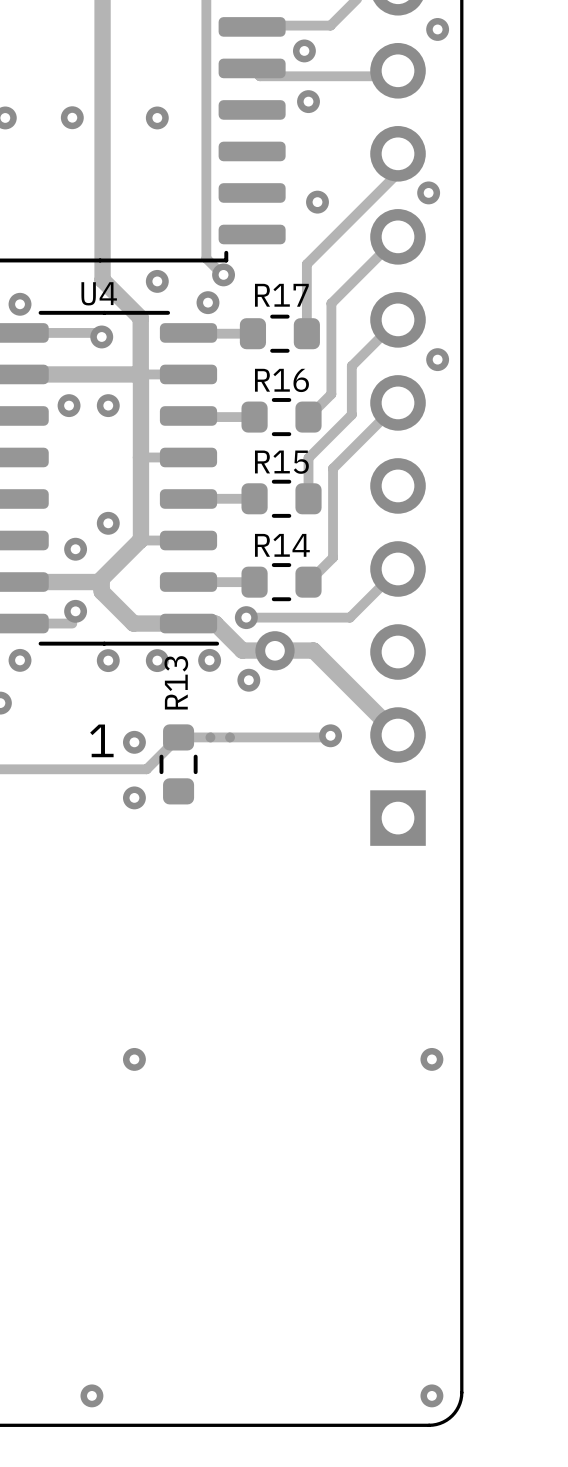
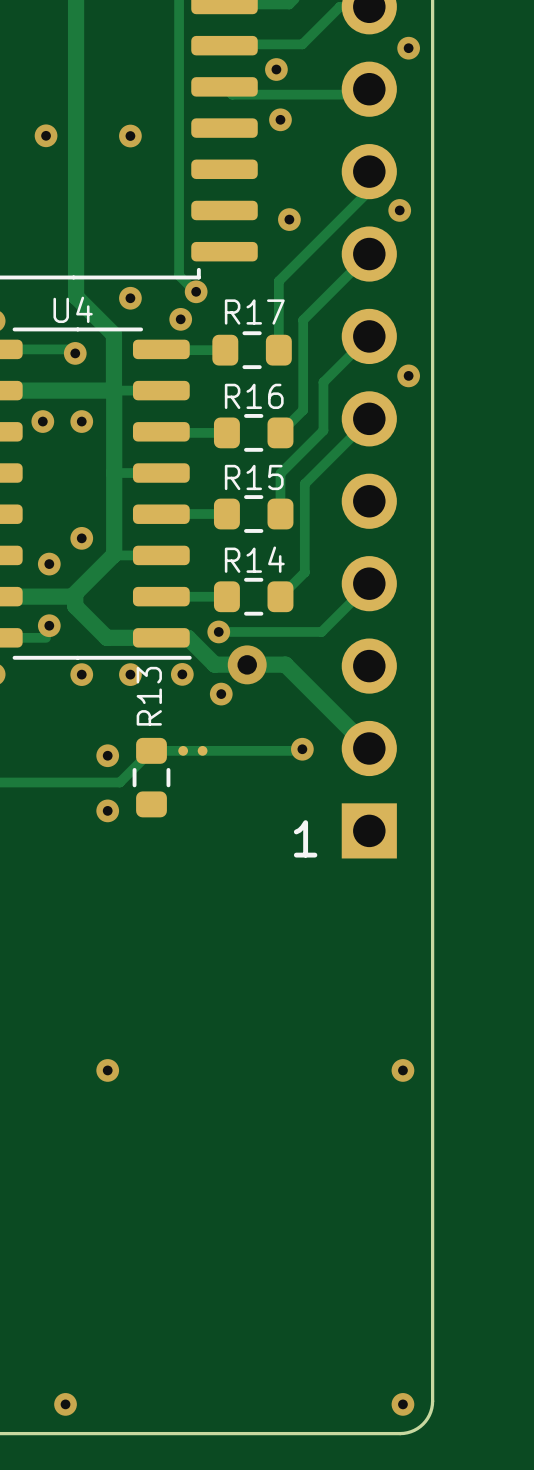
text position: 1 (101, 740) -> 1 (305, 838)

